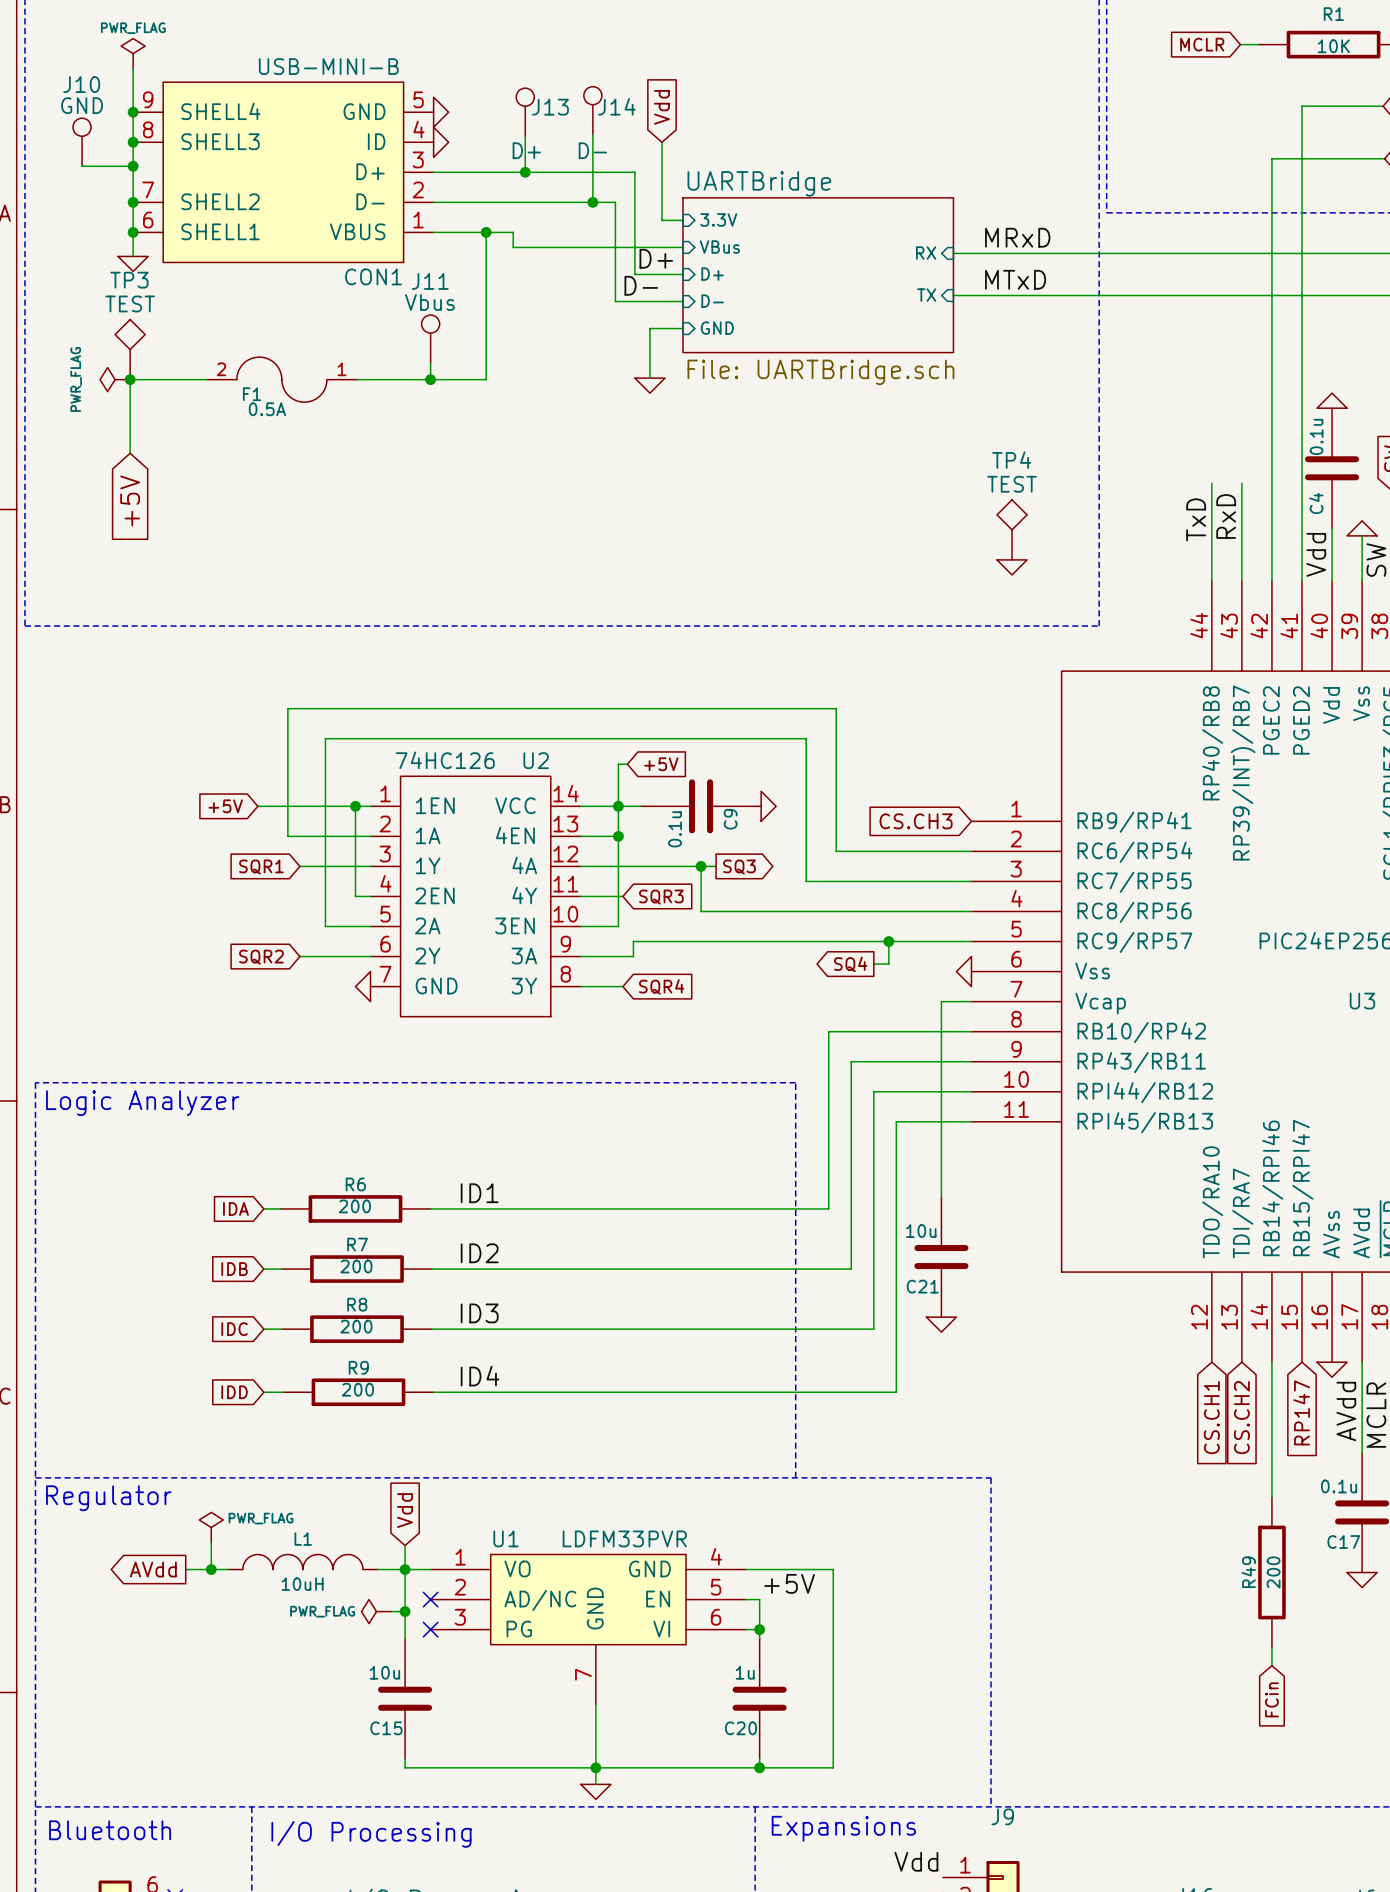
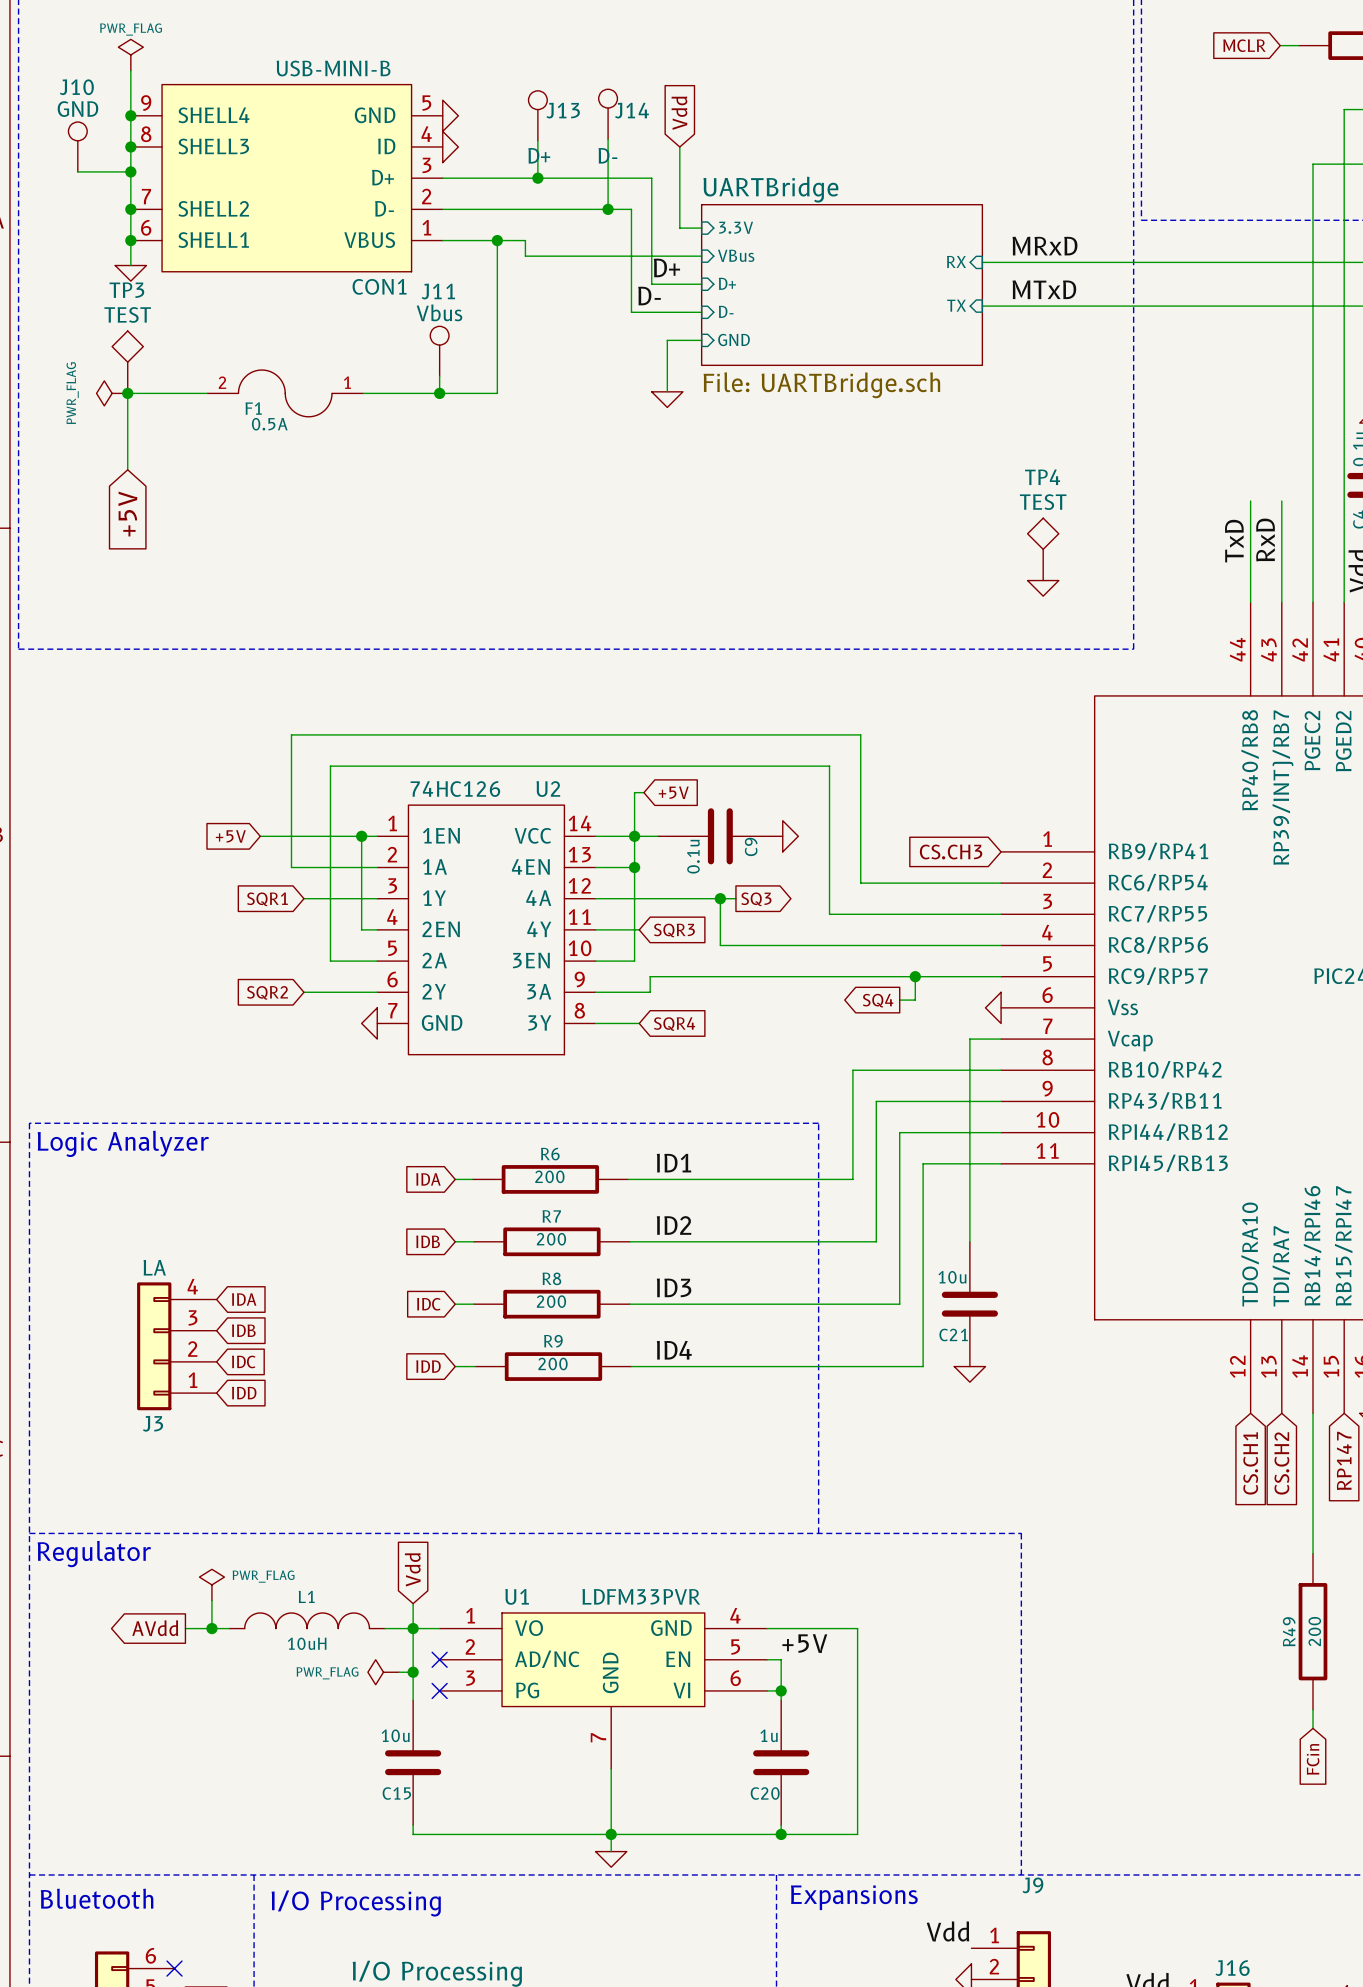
global label: none -> IDA (428, 1179)
wire: (828, 1136) (828, 1208) (430, 1208) -> (852, 1179) (628, 1179)
label position: ID1 (479, 1193) -> ID1 (674, 1163)
global label: none -> IDB (428, 1241)
wire: (851, 1196) (851, 1269) (432, 1269) -> (876, 1241) (629, 1241)
global label rotation: 0° (235, 1208) -> 180° (244, 1299)
wire: (263, 1208) (280, 1208) -> (455, 1179) (472, 1179)
R6 position: (355, 1208) -> (550, 1179)
label position: ID2 (479, 1253) -> ID2 (674, 1225)
global label: none -> IDC (428, 1304)
wire: (873, 1257) (873, 1329) (432, 1329) -> (899, 1304) (629, 1304)
global label rotation: 0° (234, 1269) -> 180° (243, 1330)
wire: (263, 1269) (281, 1269) -> (455, 1241) (473, 1241)
R7 position: (356, 1269) -> (551, 1241)
J3: none -> LA (176, 1346)
label position: ID3 (479, 1313) -> ID3 (674, 1287)
global label: none -> IDD (428, 1366)
wire: (896, 1317) (896, 1392) (433, 1392) -> (923, 1366) (631, 1366)
global label rotation: 0° (234, 1329) -> 180° (243, 1361)
wire: (263, 1329) (281, 1329) -> (455, 1304) (473, 1304)
R8 position: (356, 1329) -> (551, 1304)
label position: ID4 (480, 1376) -> ID4 (674, 1350)
global label rotation: 0° (234, 1392) -> 180° (244, 1393)
wire: (263, 1392) (283, 1392) -> (455, 1366) (475, 1366)
R9 position: (358, 1392) -> (553, 1366)

